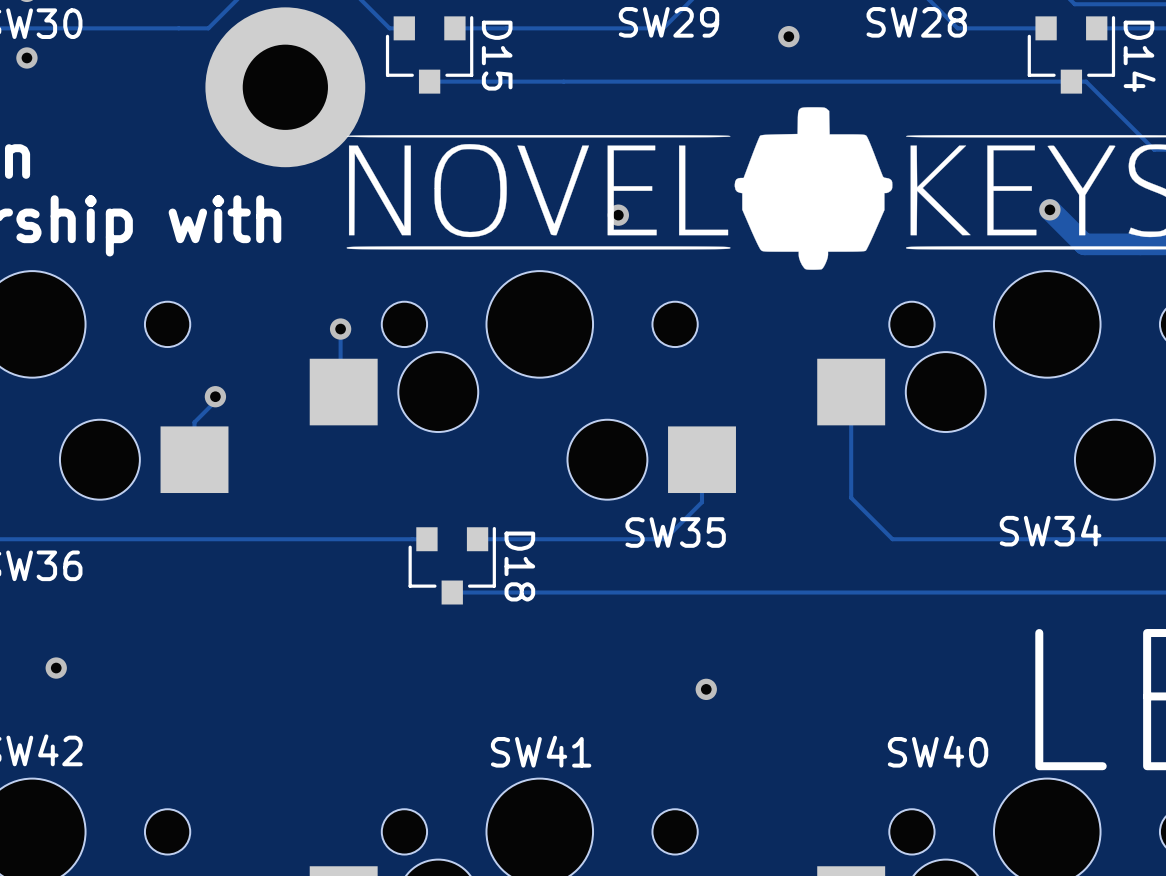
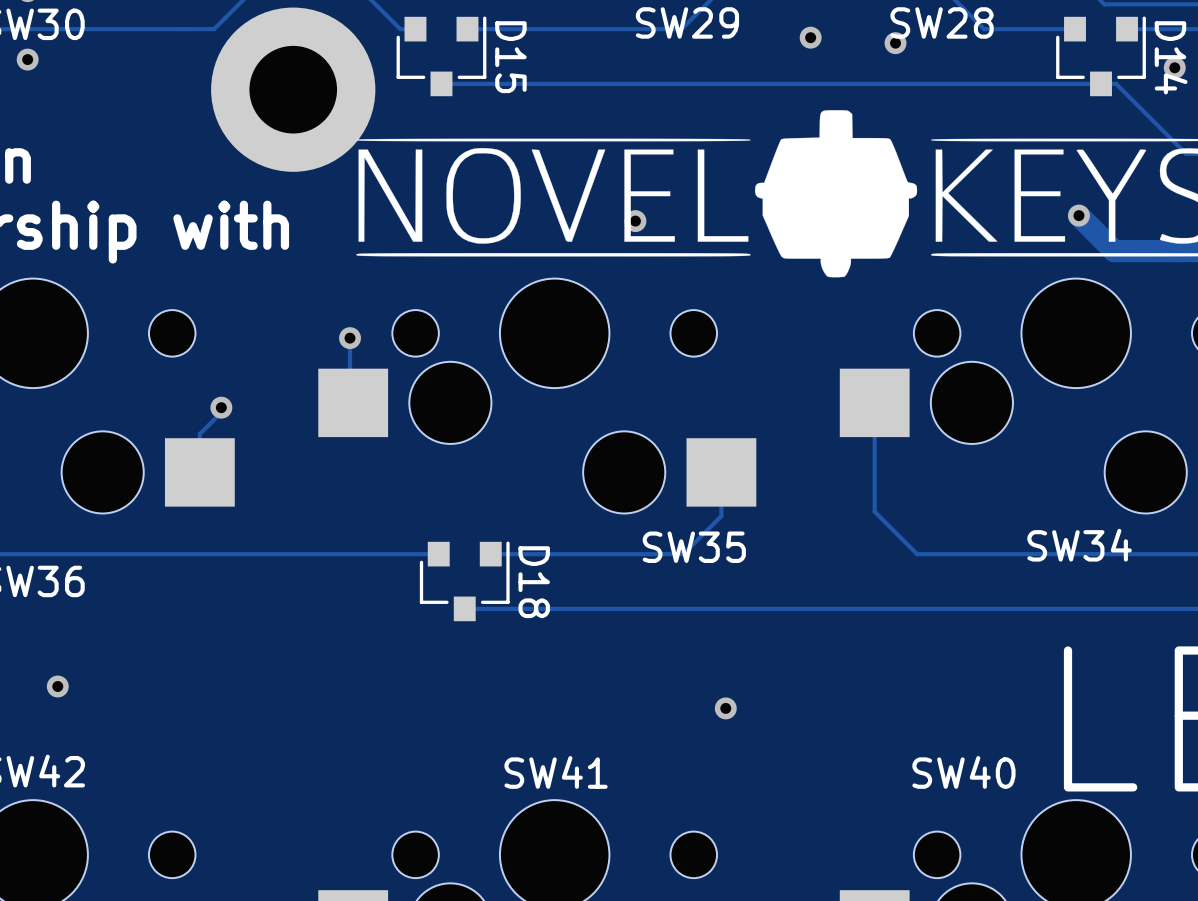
via: none -> (895, 43)
via: none -> (1174, 67)

